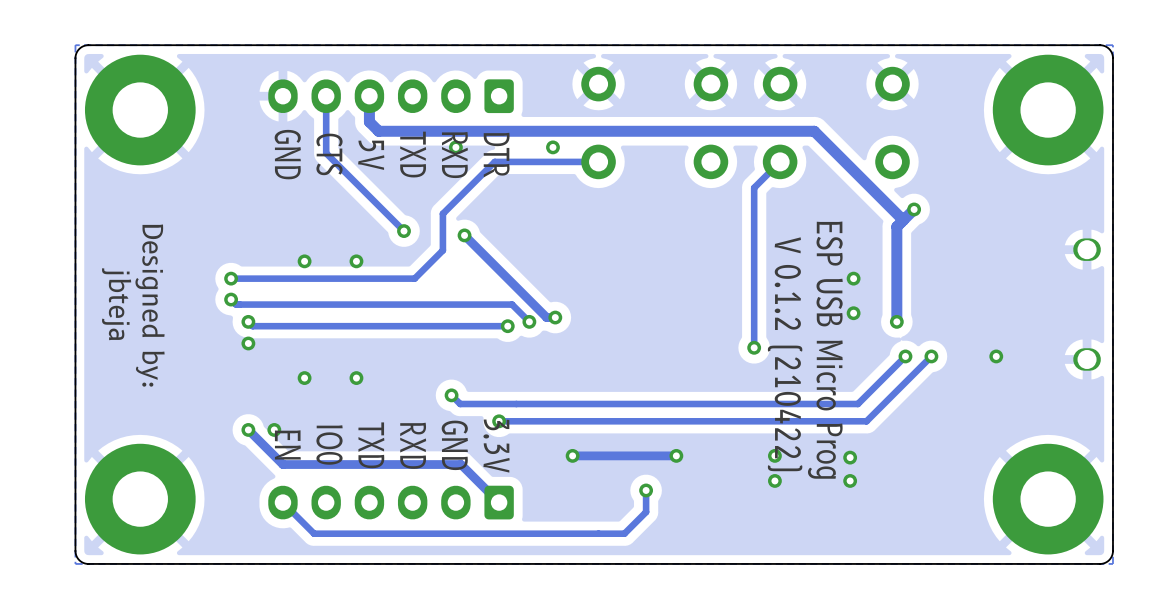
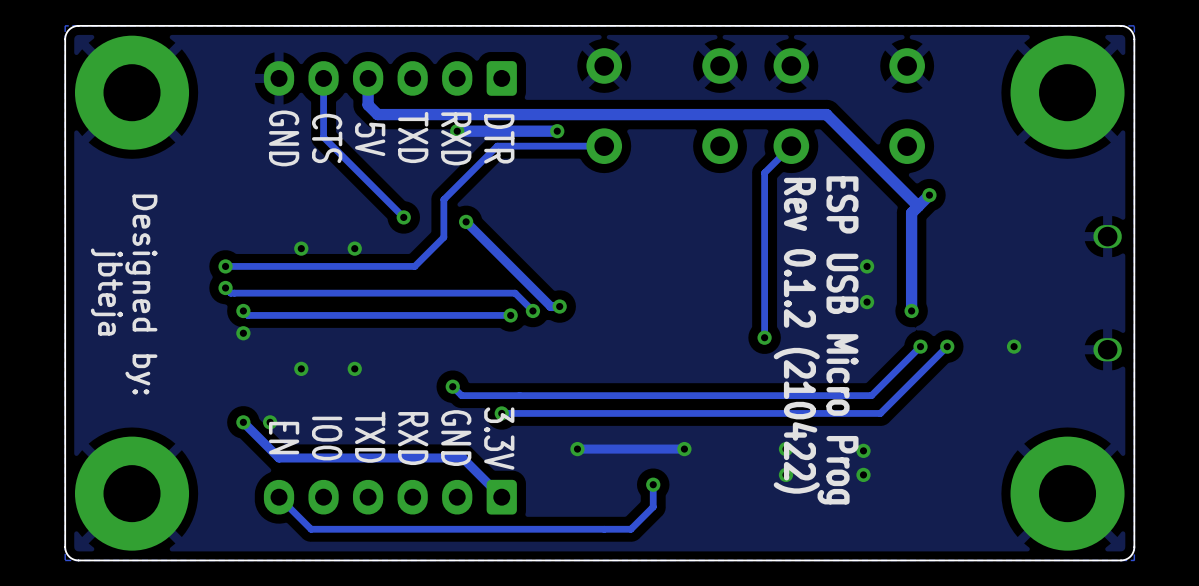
track: none -> (557, 131) (457, 131)
text: V 0.1.2 (210422) (785, 354) -> Rev 0.1.2 (210422) (796, 335)

